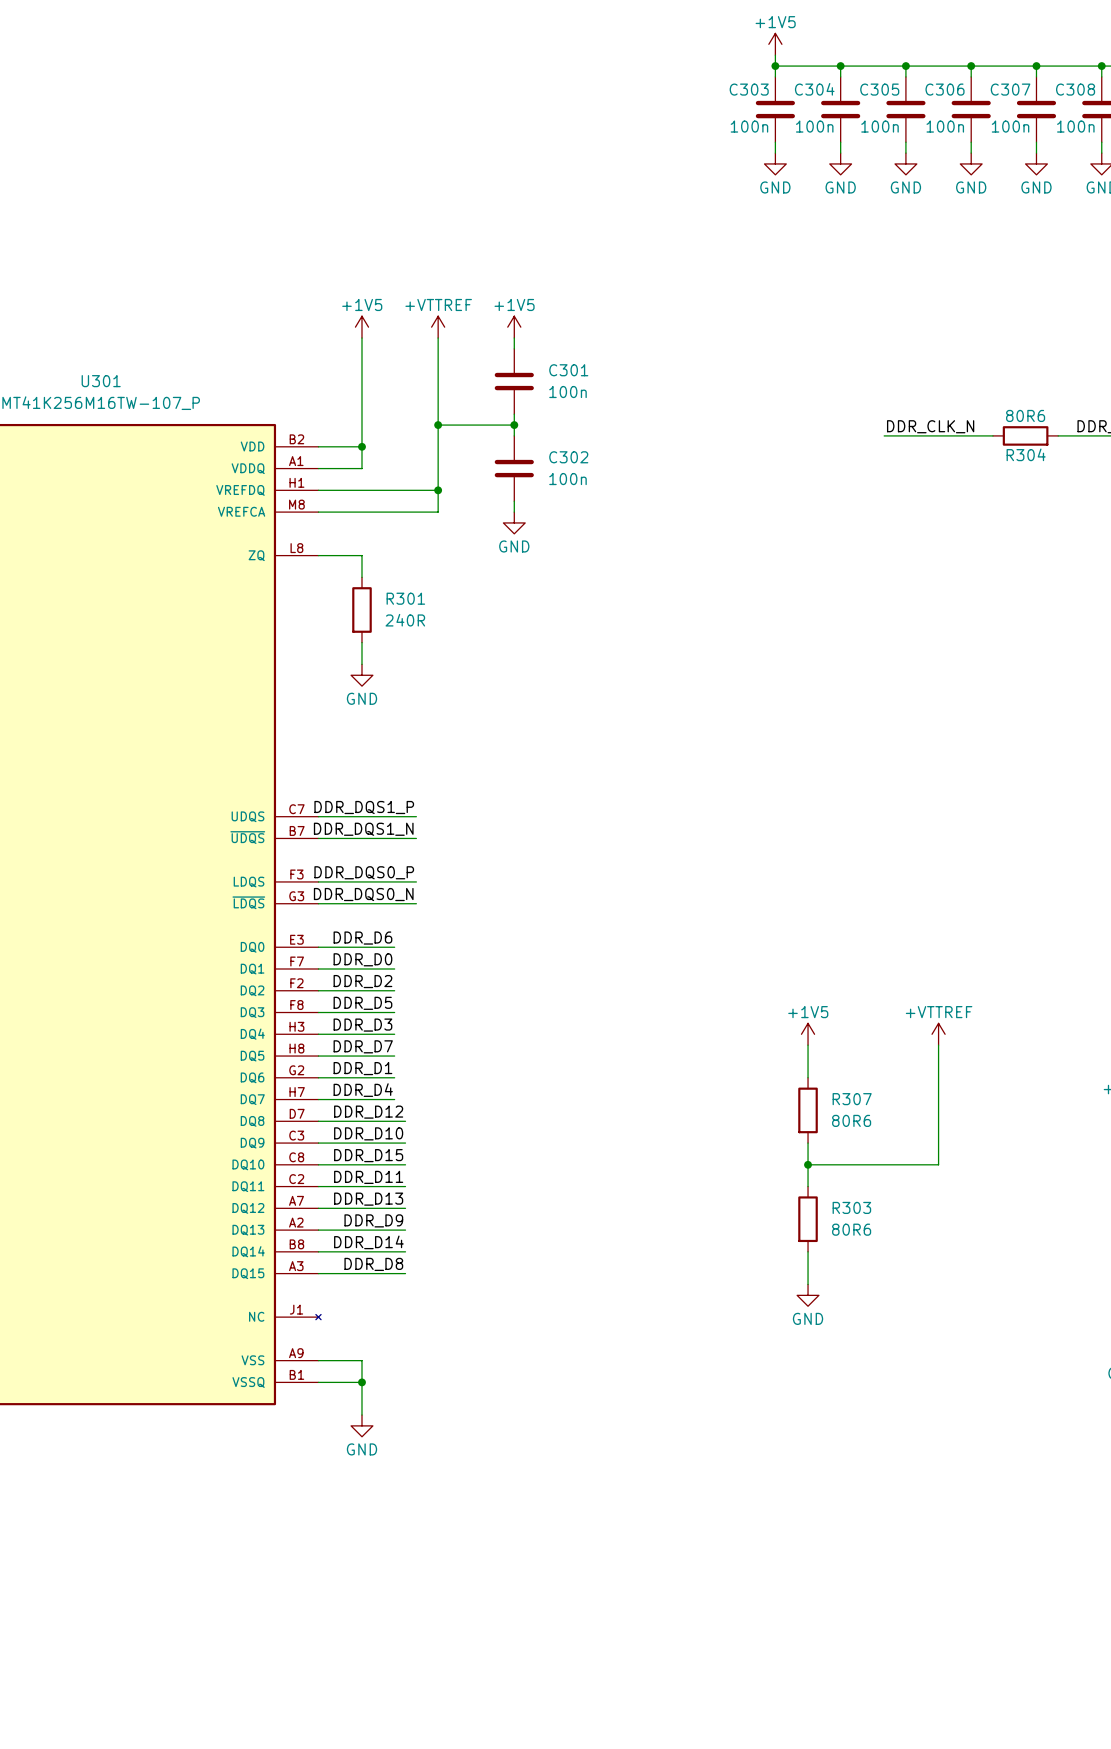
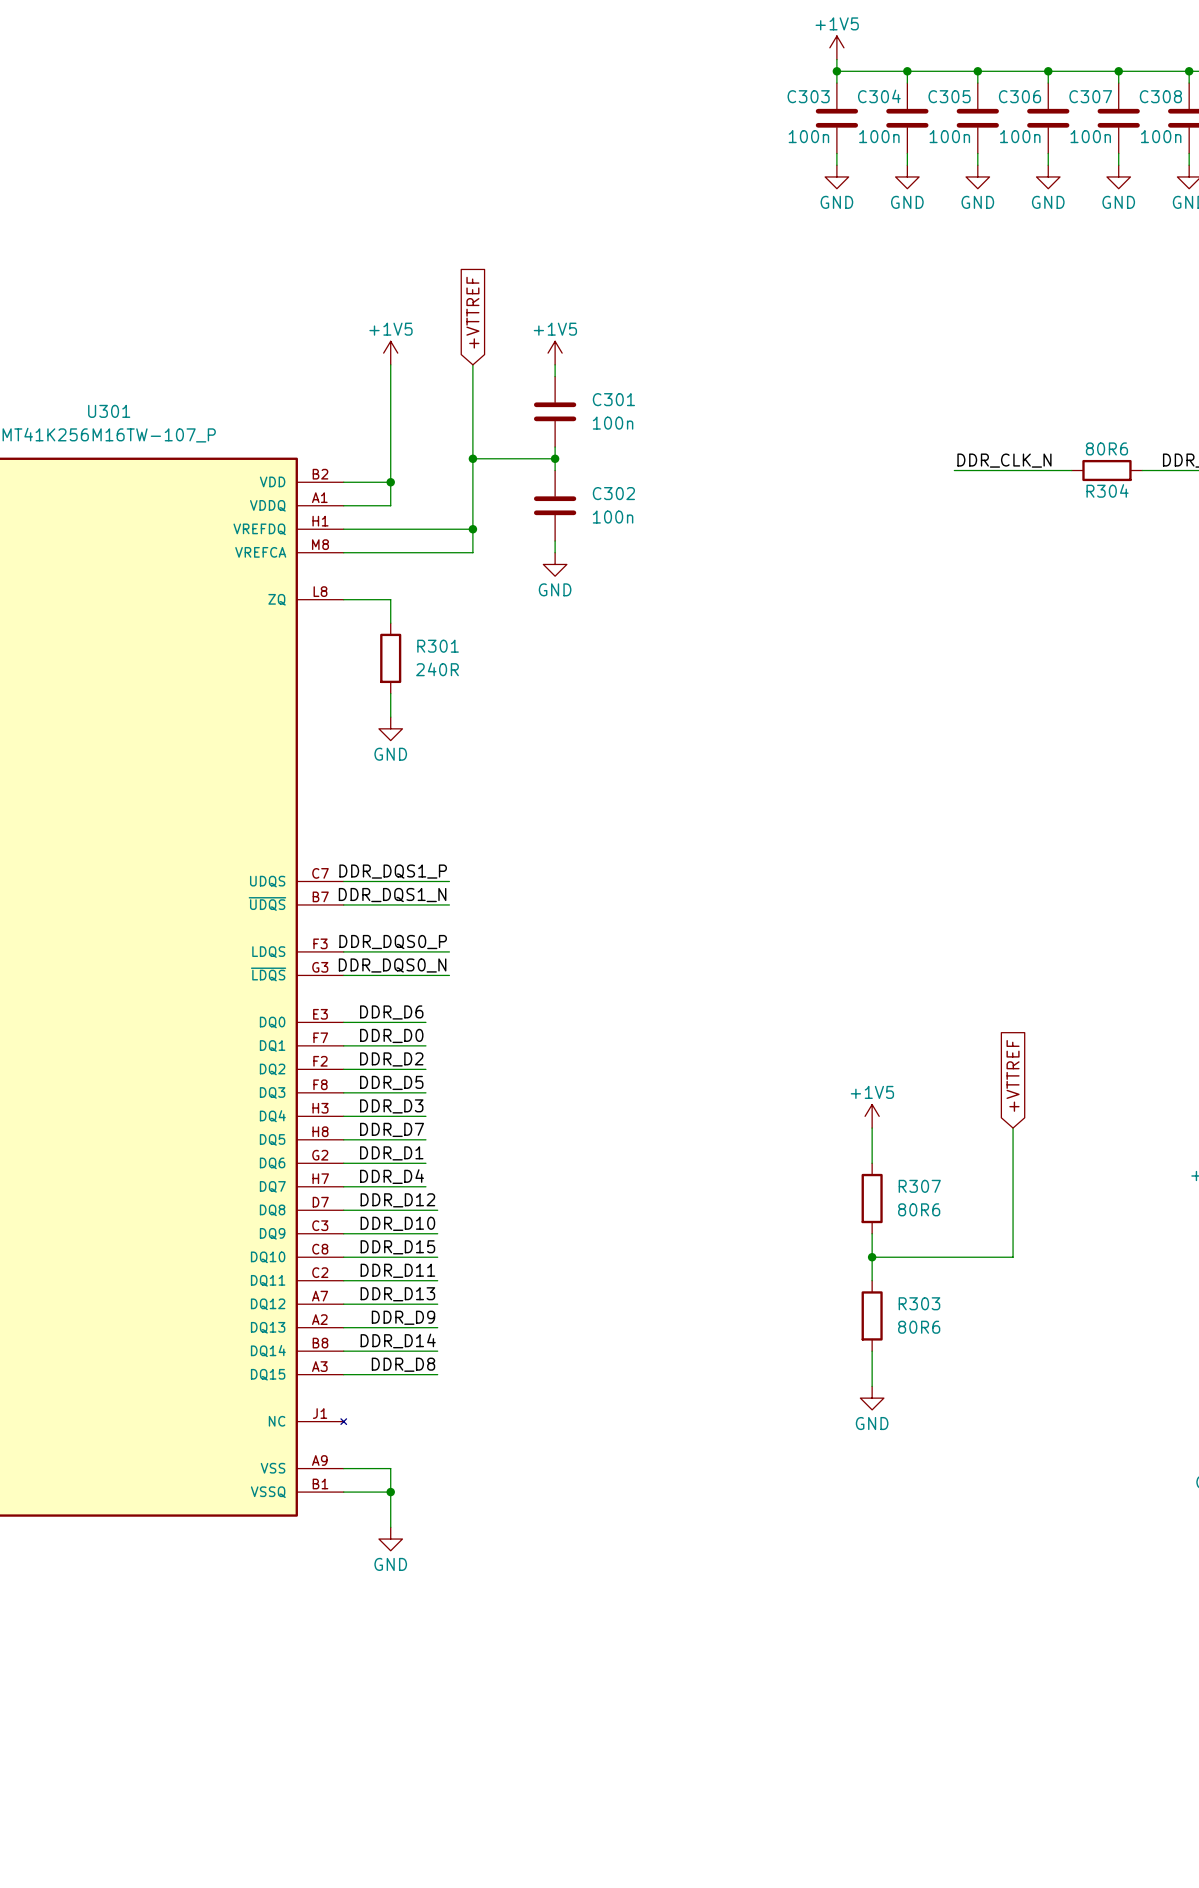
global label: none -> +VTTREF (472, 312)
power symbol: +VTTREF (438, 327) -> none
global label: none -> +VTTREF (1013, 1075)
power symbol: +VTTREF (938, 1034) -> none

